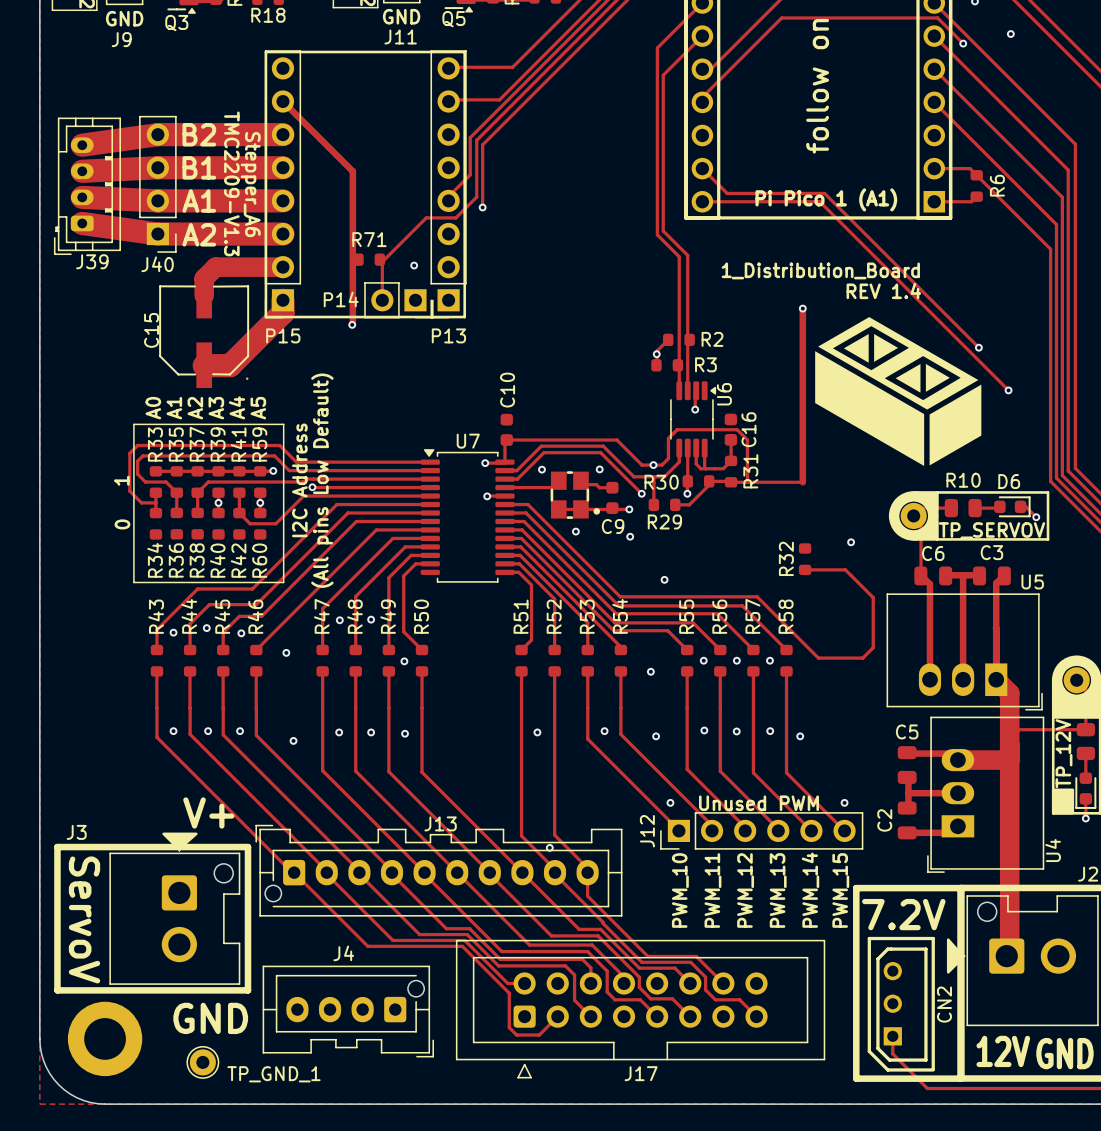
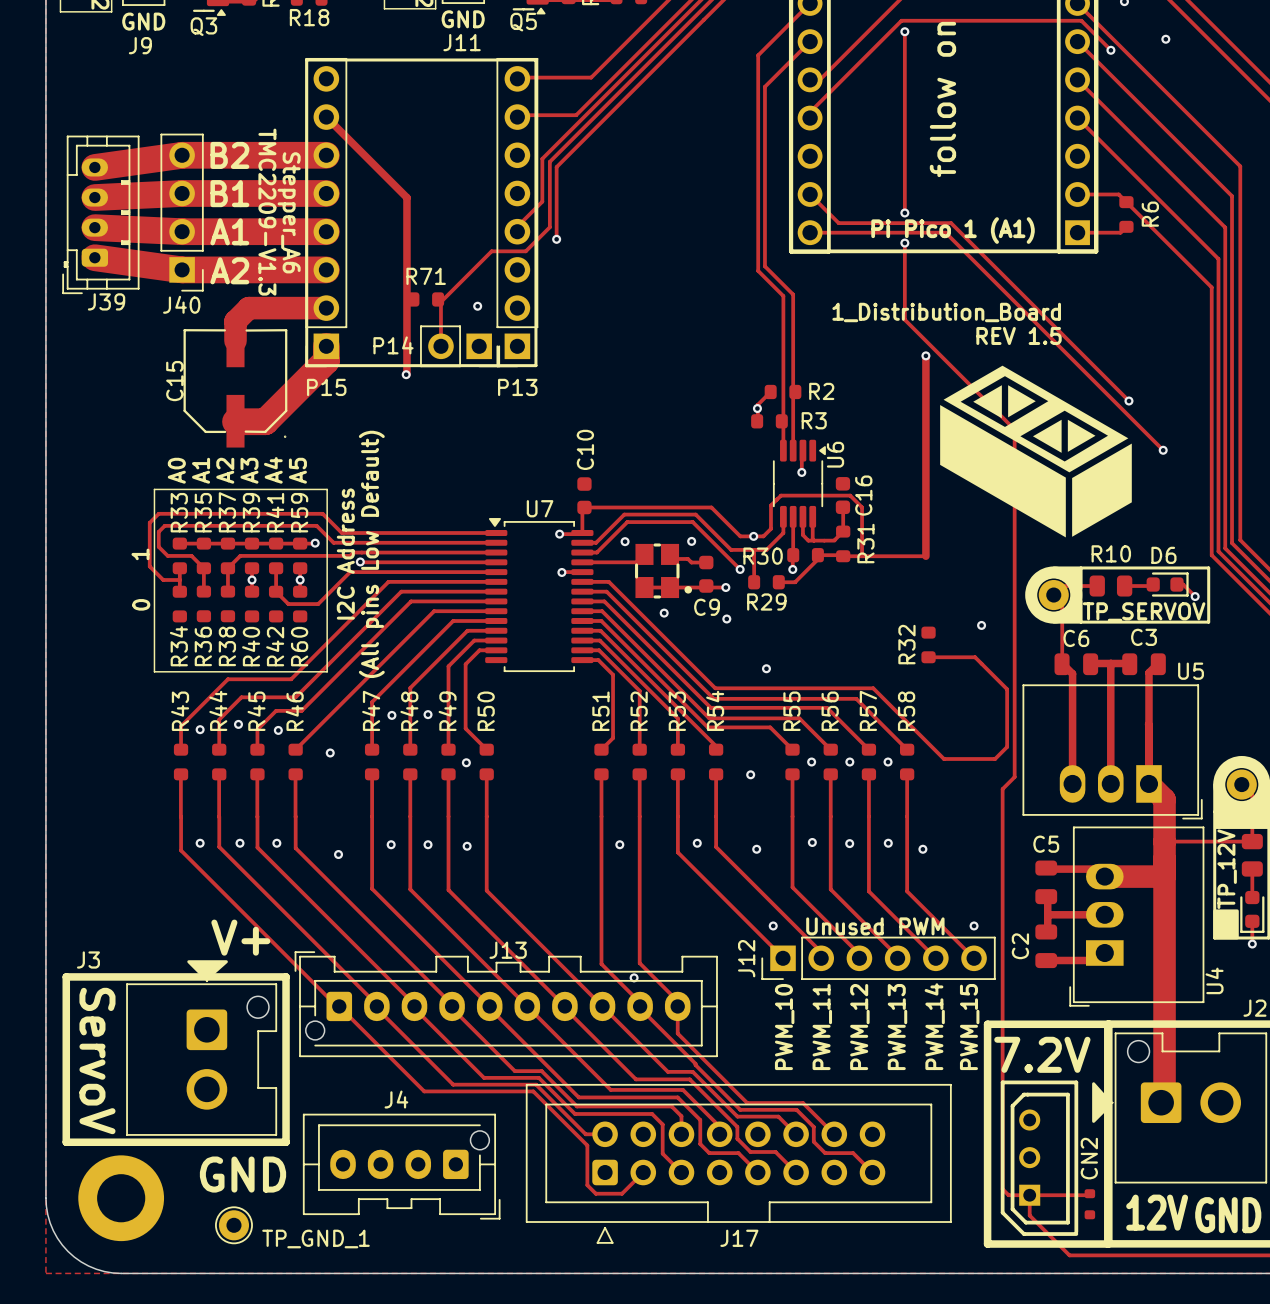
track: none -> (904, 31) (904, 212)
via: none -> (904, 31)
via: none -> (904, 212)
track: none -> (904, 243) (904, 319) (1014, 429) (1014, 777) (1002, 789) (1002, 1189) (1008, 1195) (1089, 1195) (1089, 1193)
via: none -> (904, 243)
text: REV 1.4 (883, 291) -> REV 1.5 (1019, 335)
part: none -> (1089, 1204)

